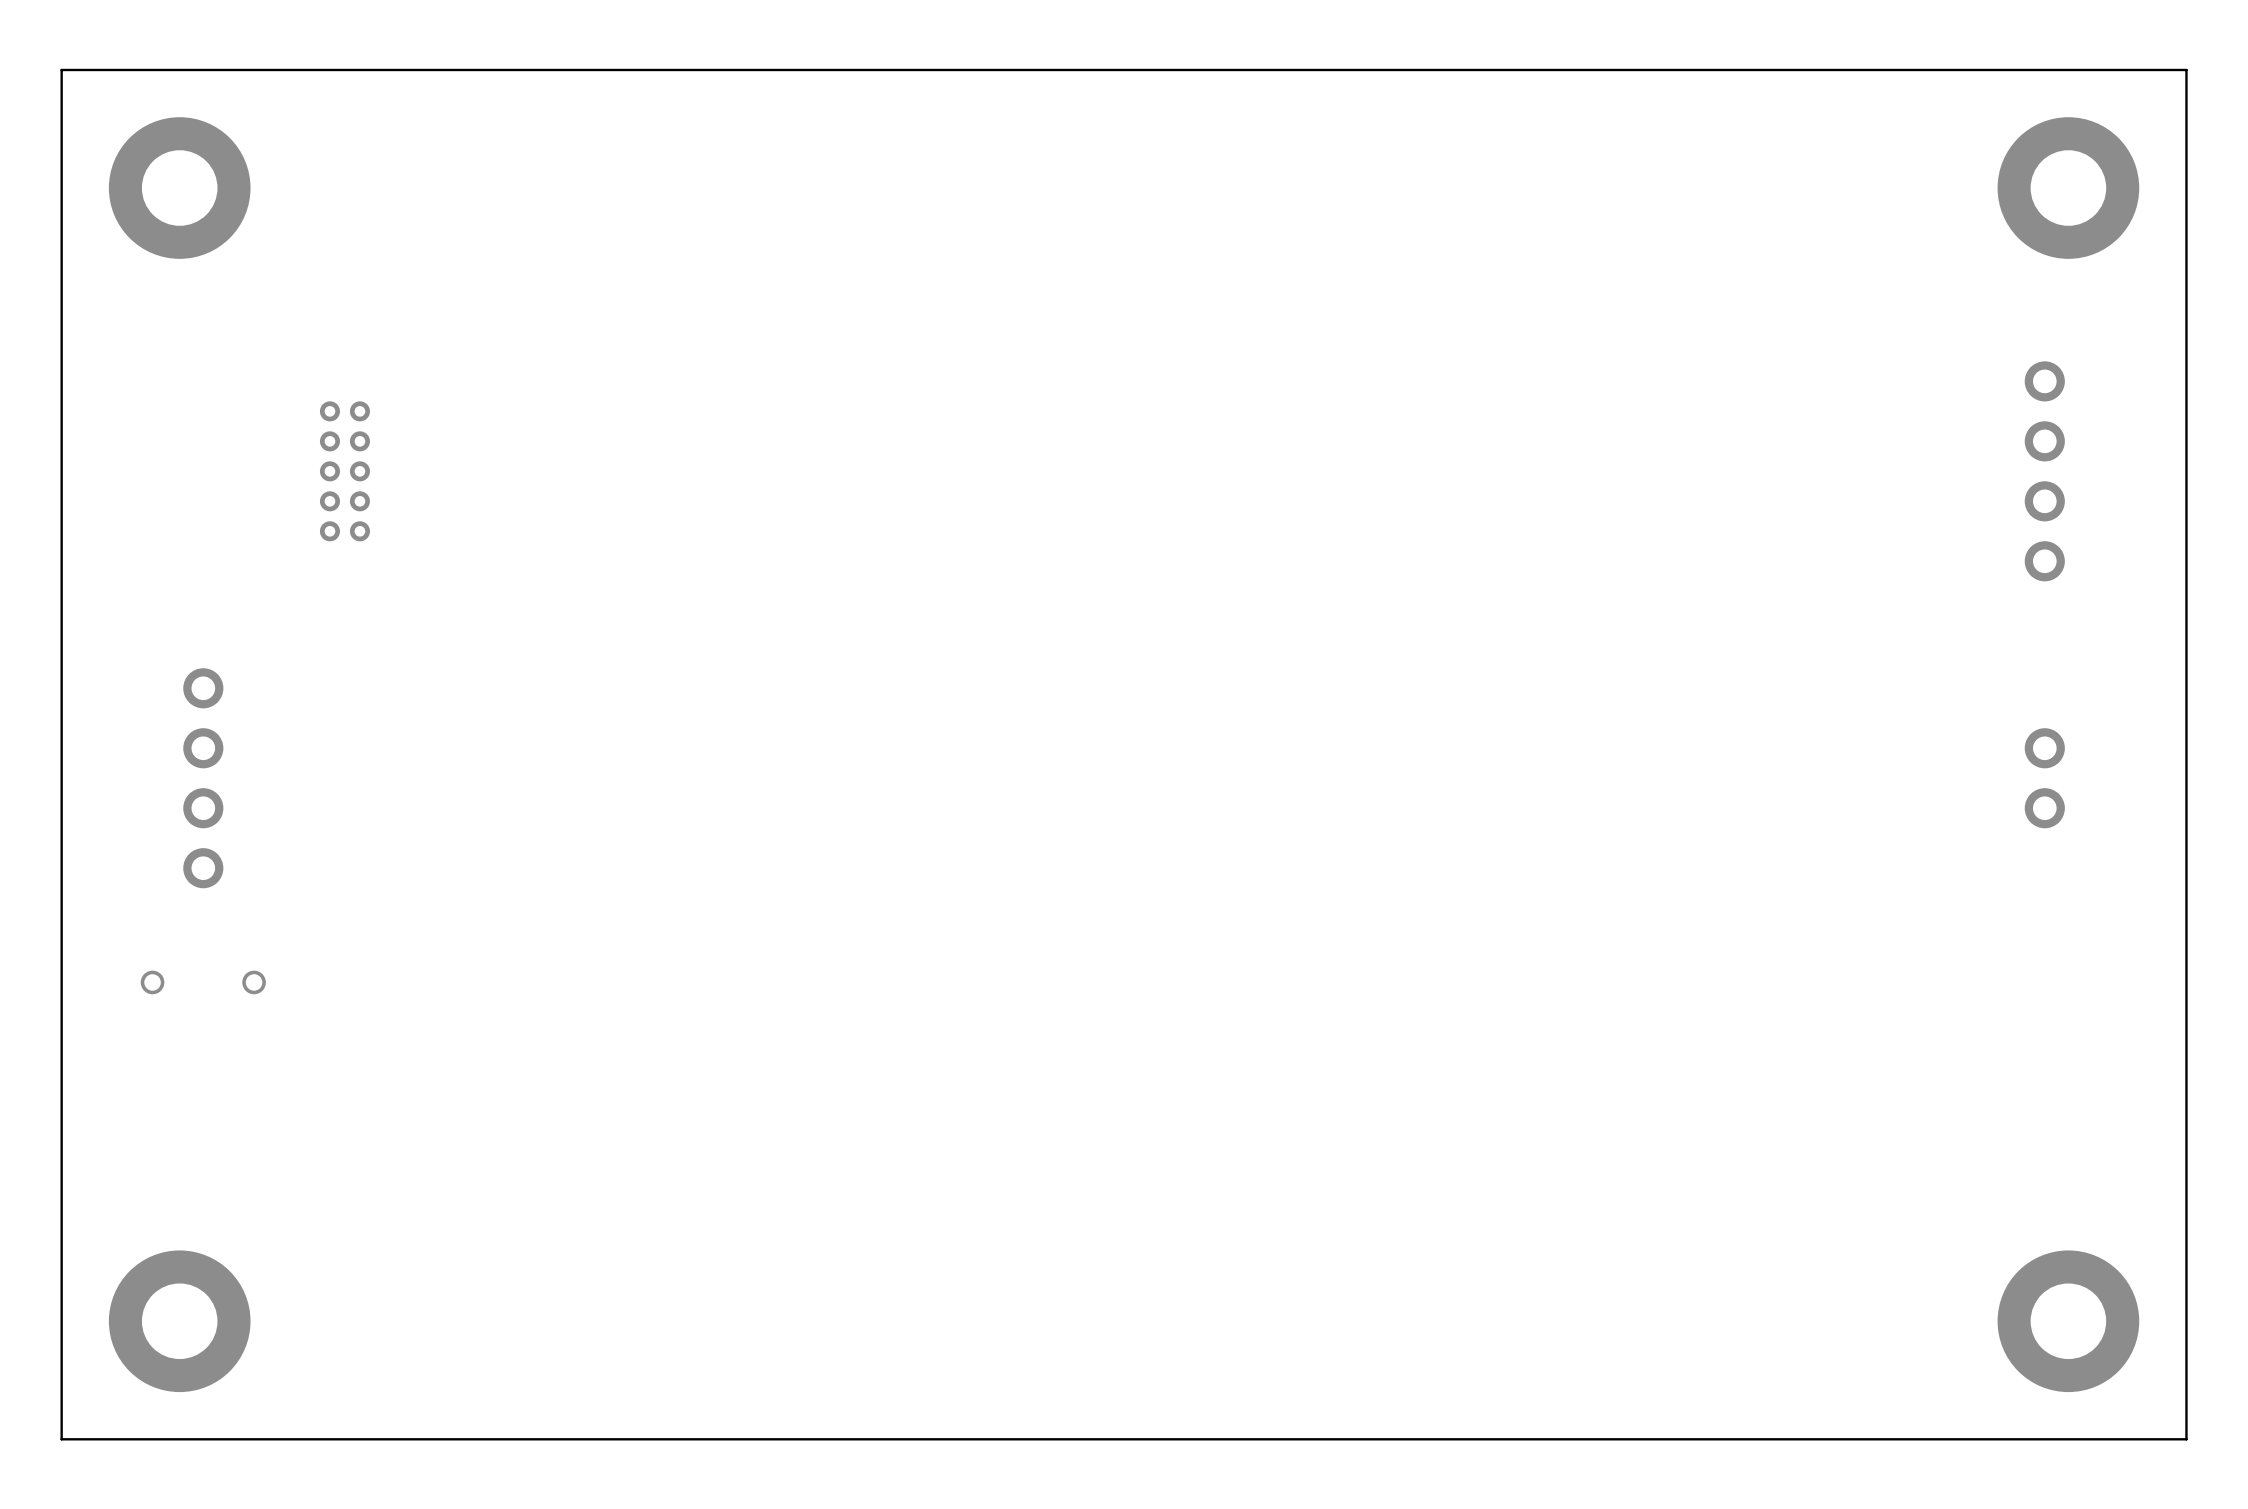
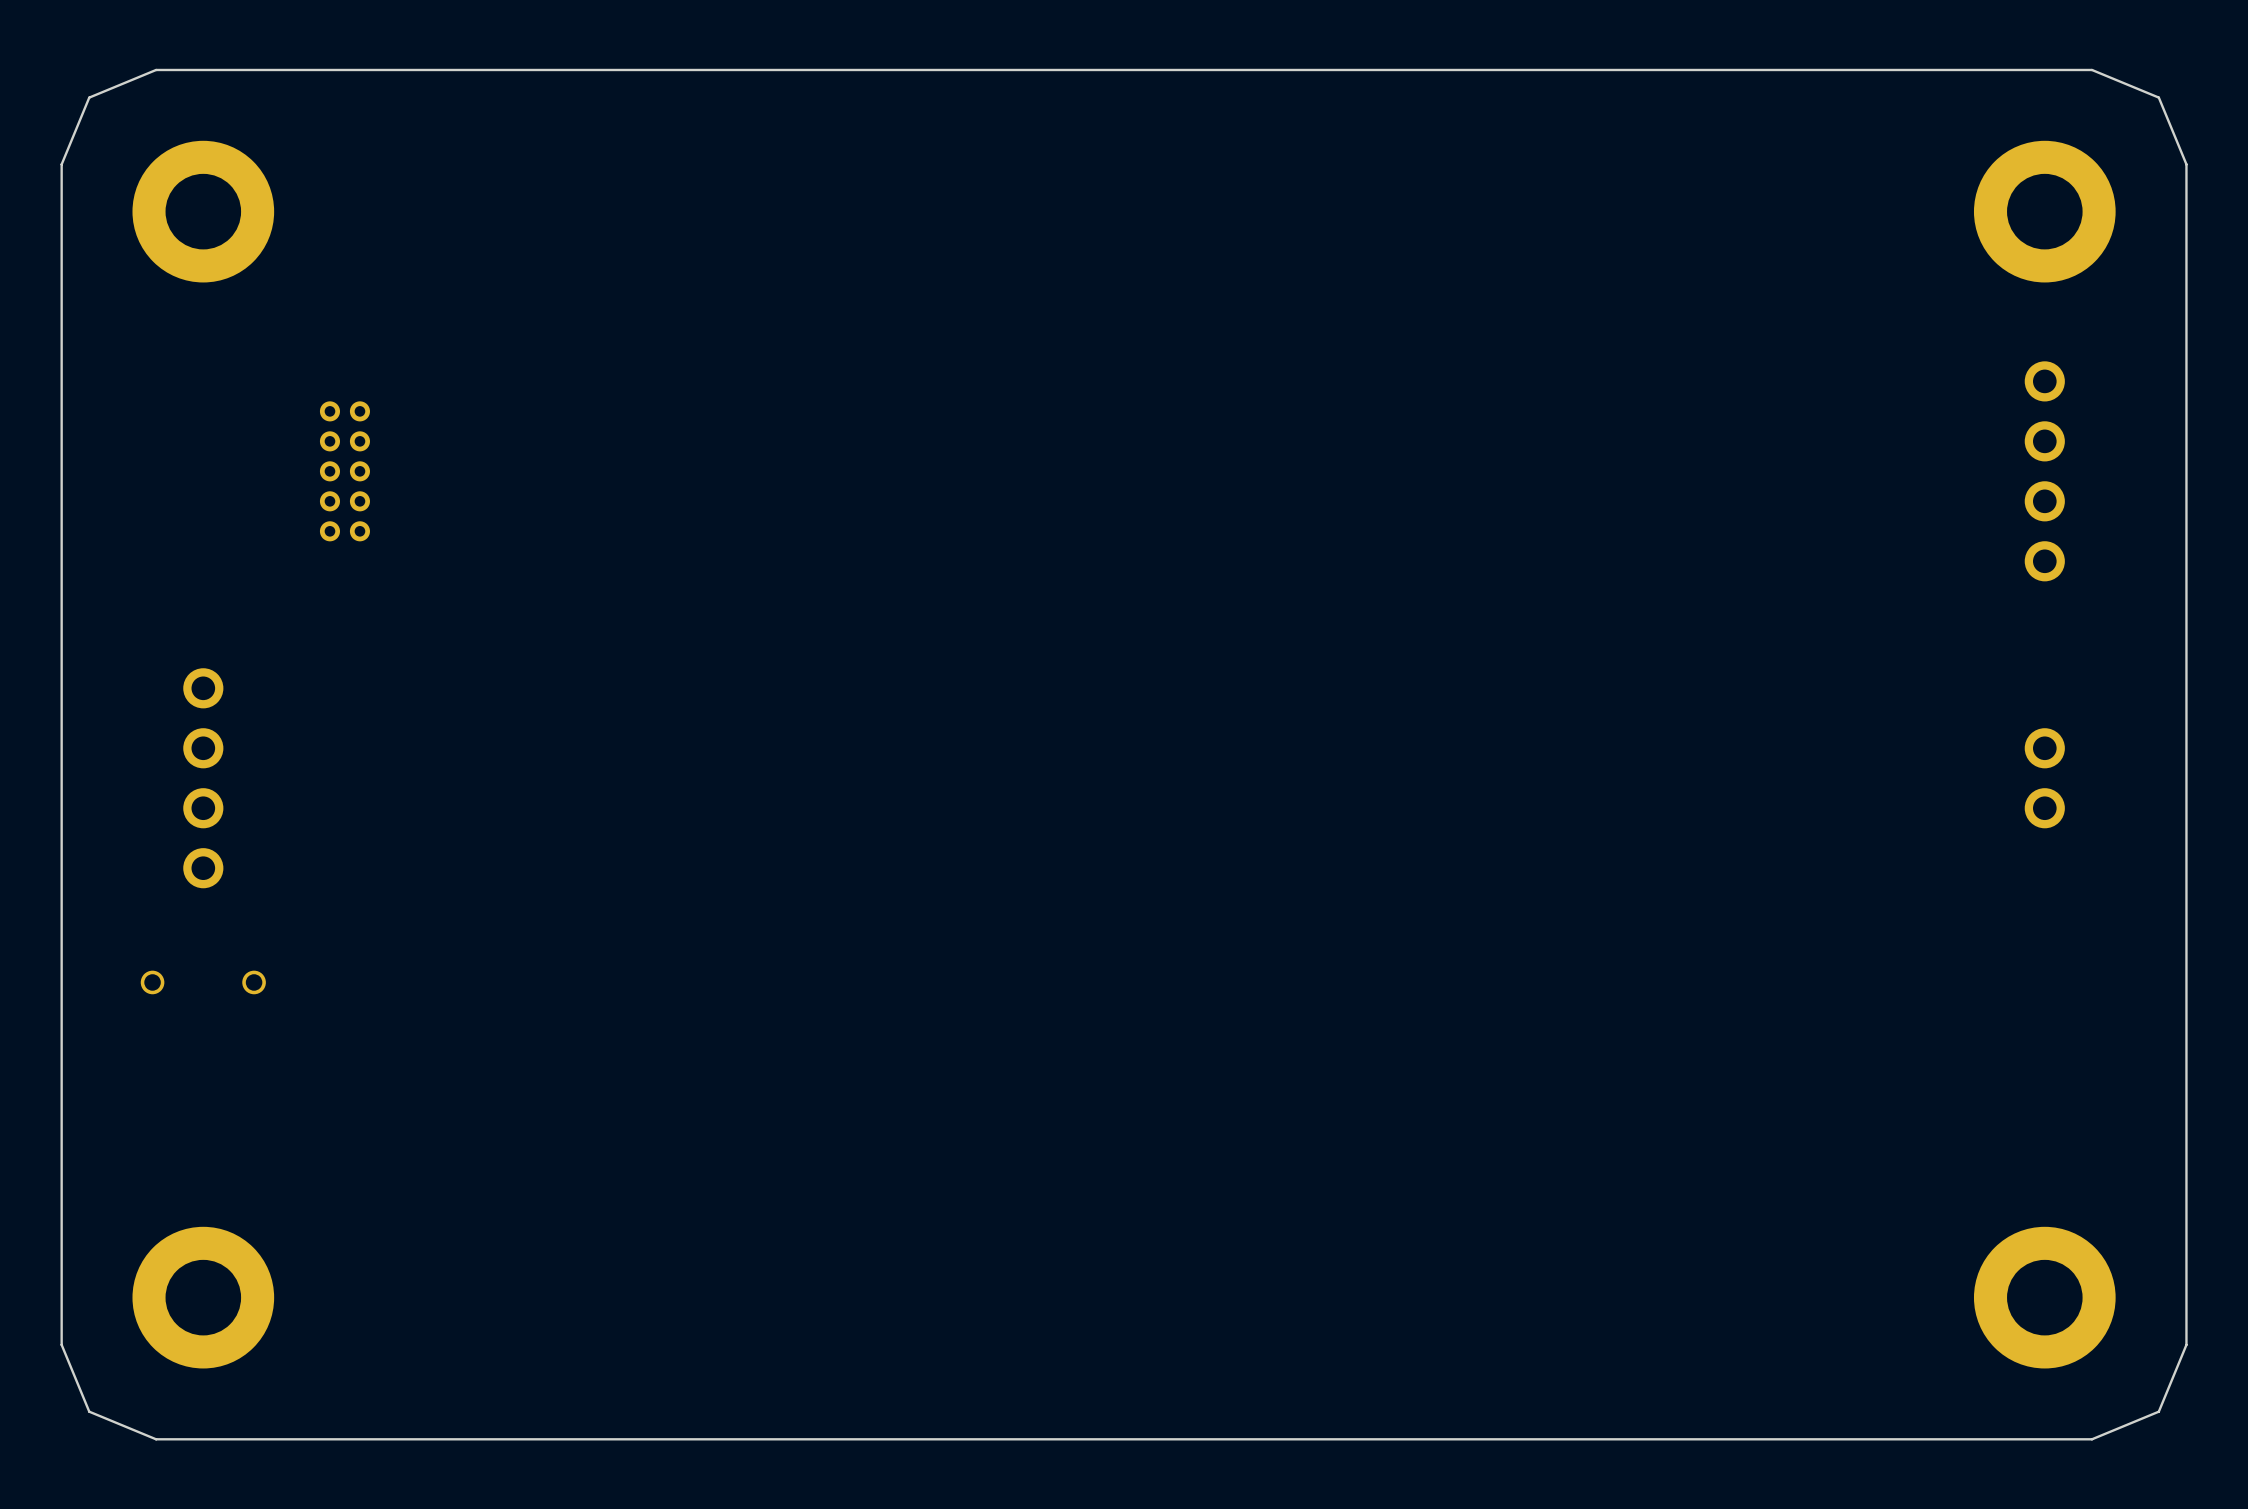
board edge: (156, 69) (61, 69) (61, 164) -> (156, 69) (89, 97) (61, 164)
board edge: (2092, 69) (2186, 69) (2186, 164) -> (2092, 69) (2158, 97) (2186, 164)
part position: (179, 188) -> (203, 211)
part position: (2068, 188) -> (2044, 211)
part position: (179, 1321) -> (203, 1297)
part position: (2068, 1321) -> (2044, 1297)
board edge: (61, 1344) (61, 1439) (156, 1439) -> (61, 1344) (89, 1411) (156, 1439)
board edge: (2186, 1344) (2186, 1439) (2092, 1439) -> (2186, 1344) (2158, 1411) (2092, 1439)

